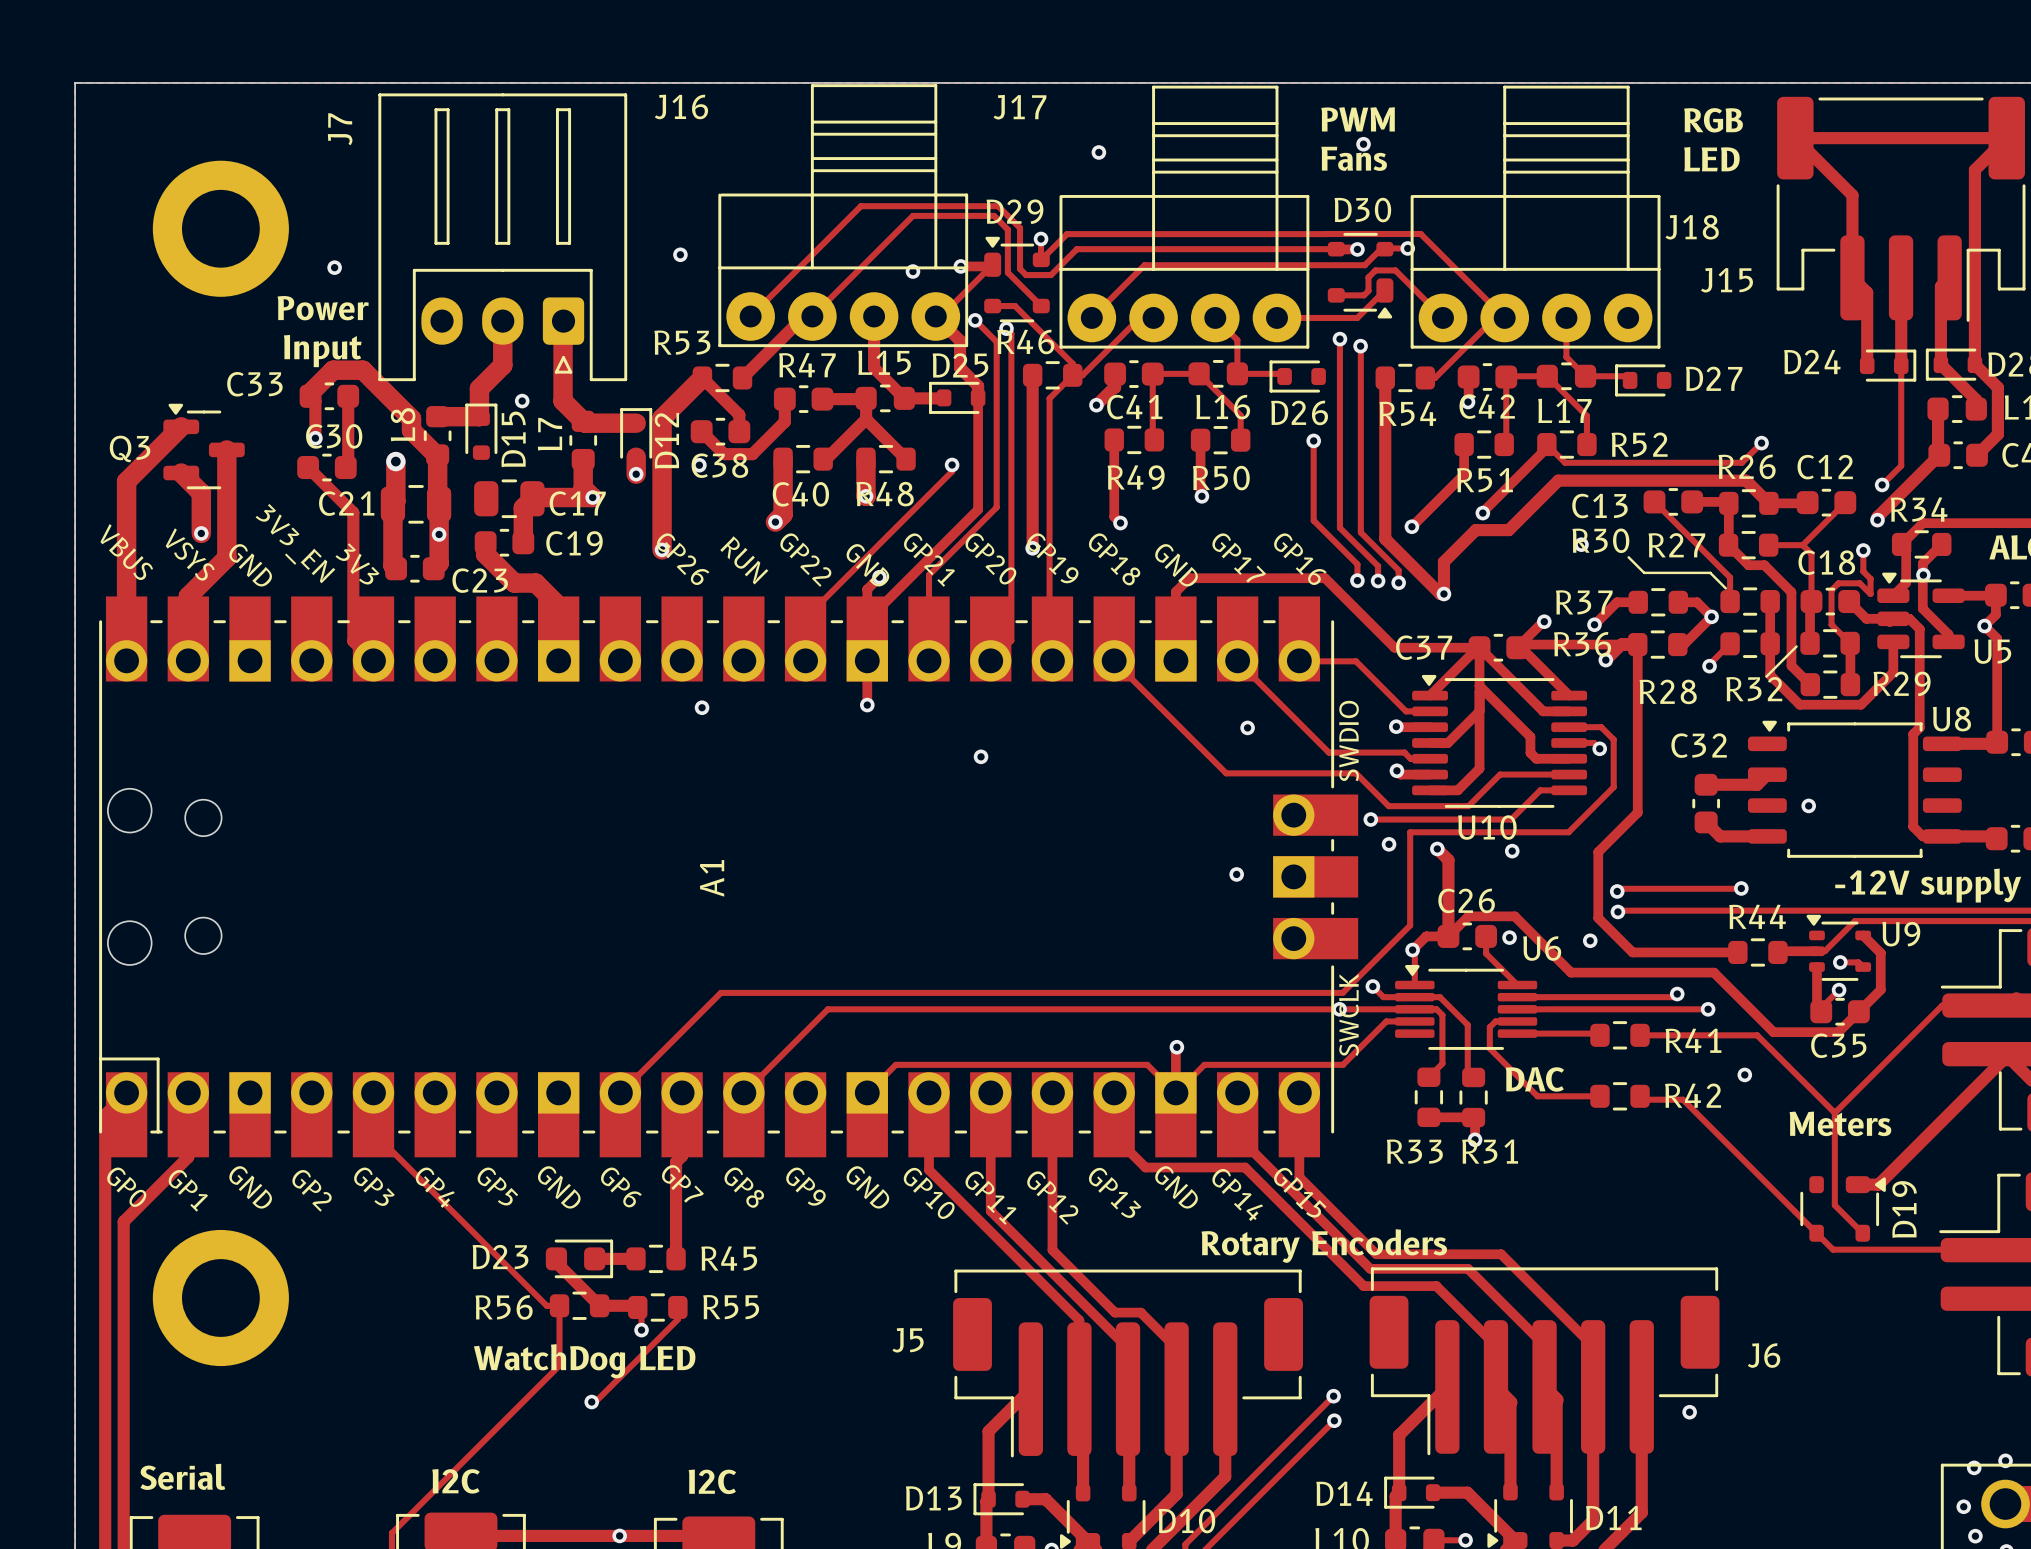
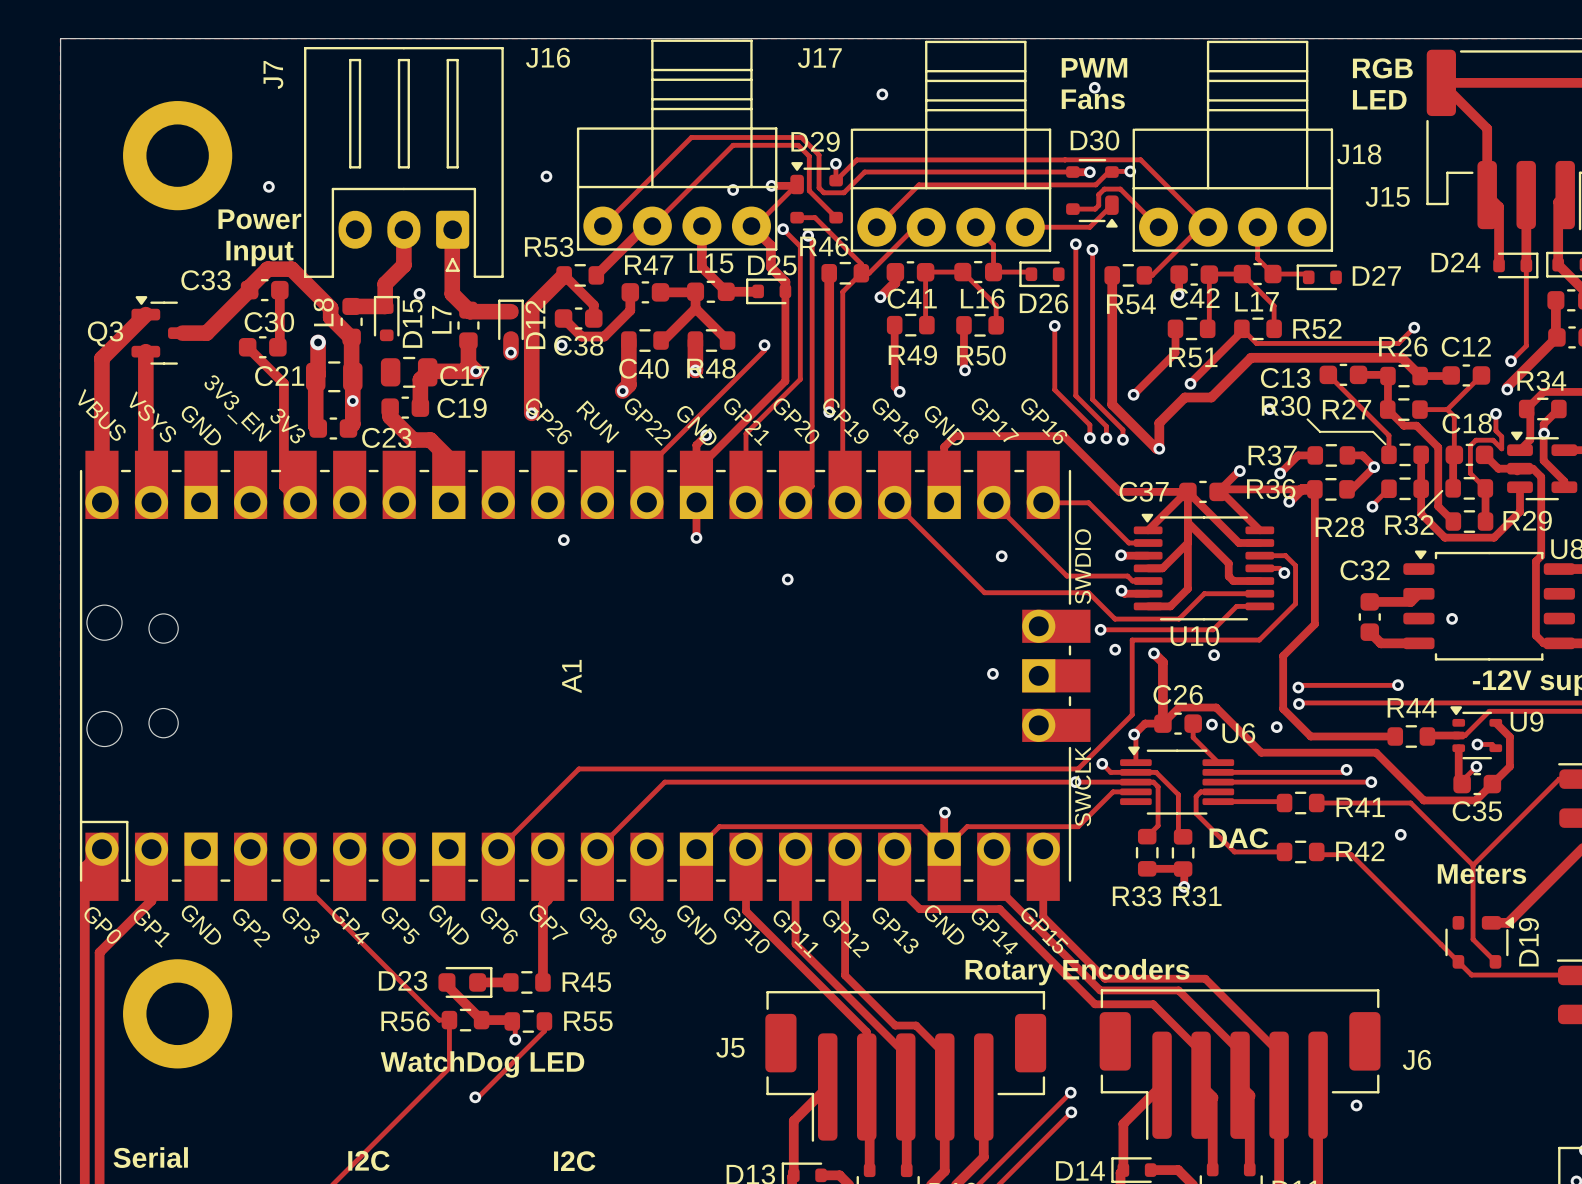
track: none -> (249, 290) (206, 333) (182, 333)
track: (315, 401) (315, 438) -> none
via: (315, 438) -> none
track: (226, 449) (226, 557) (188, 596) (188, 661) -> (145, 351) (145, 496) (151, 502)
track: (181, 472) (201, 493) (201, 533) -> none
via: (201, 533) -> none

